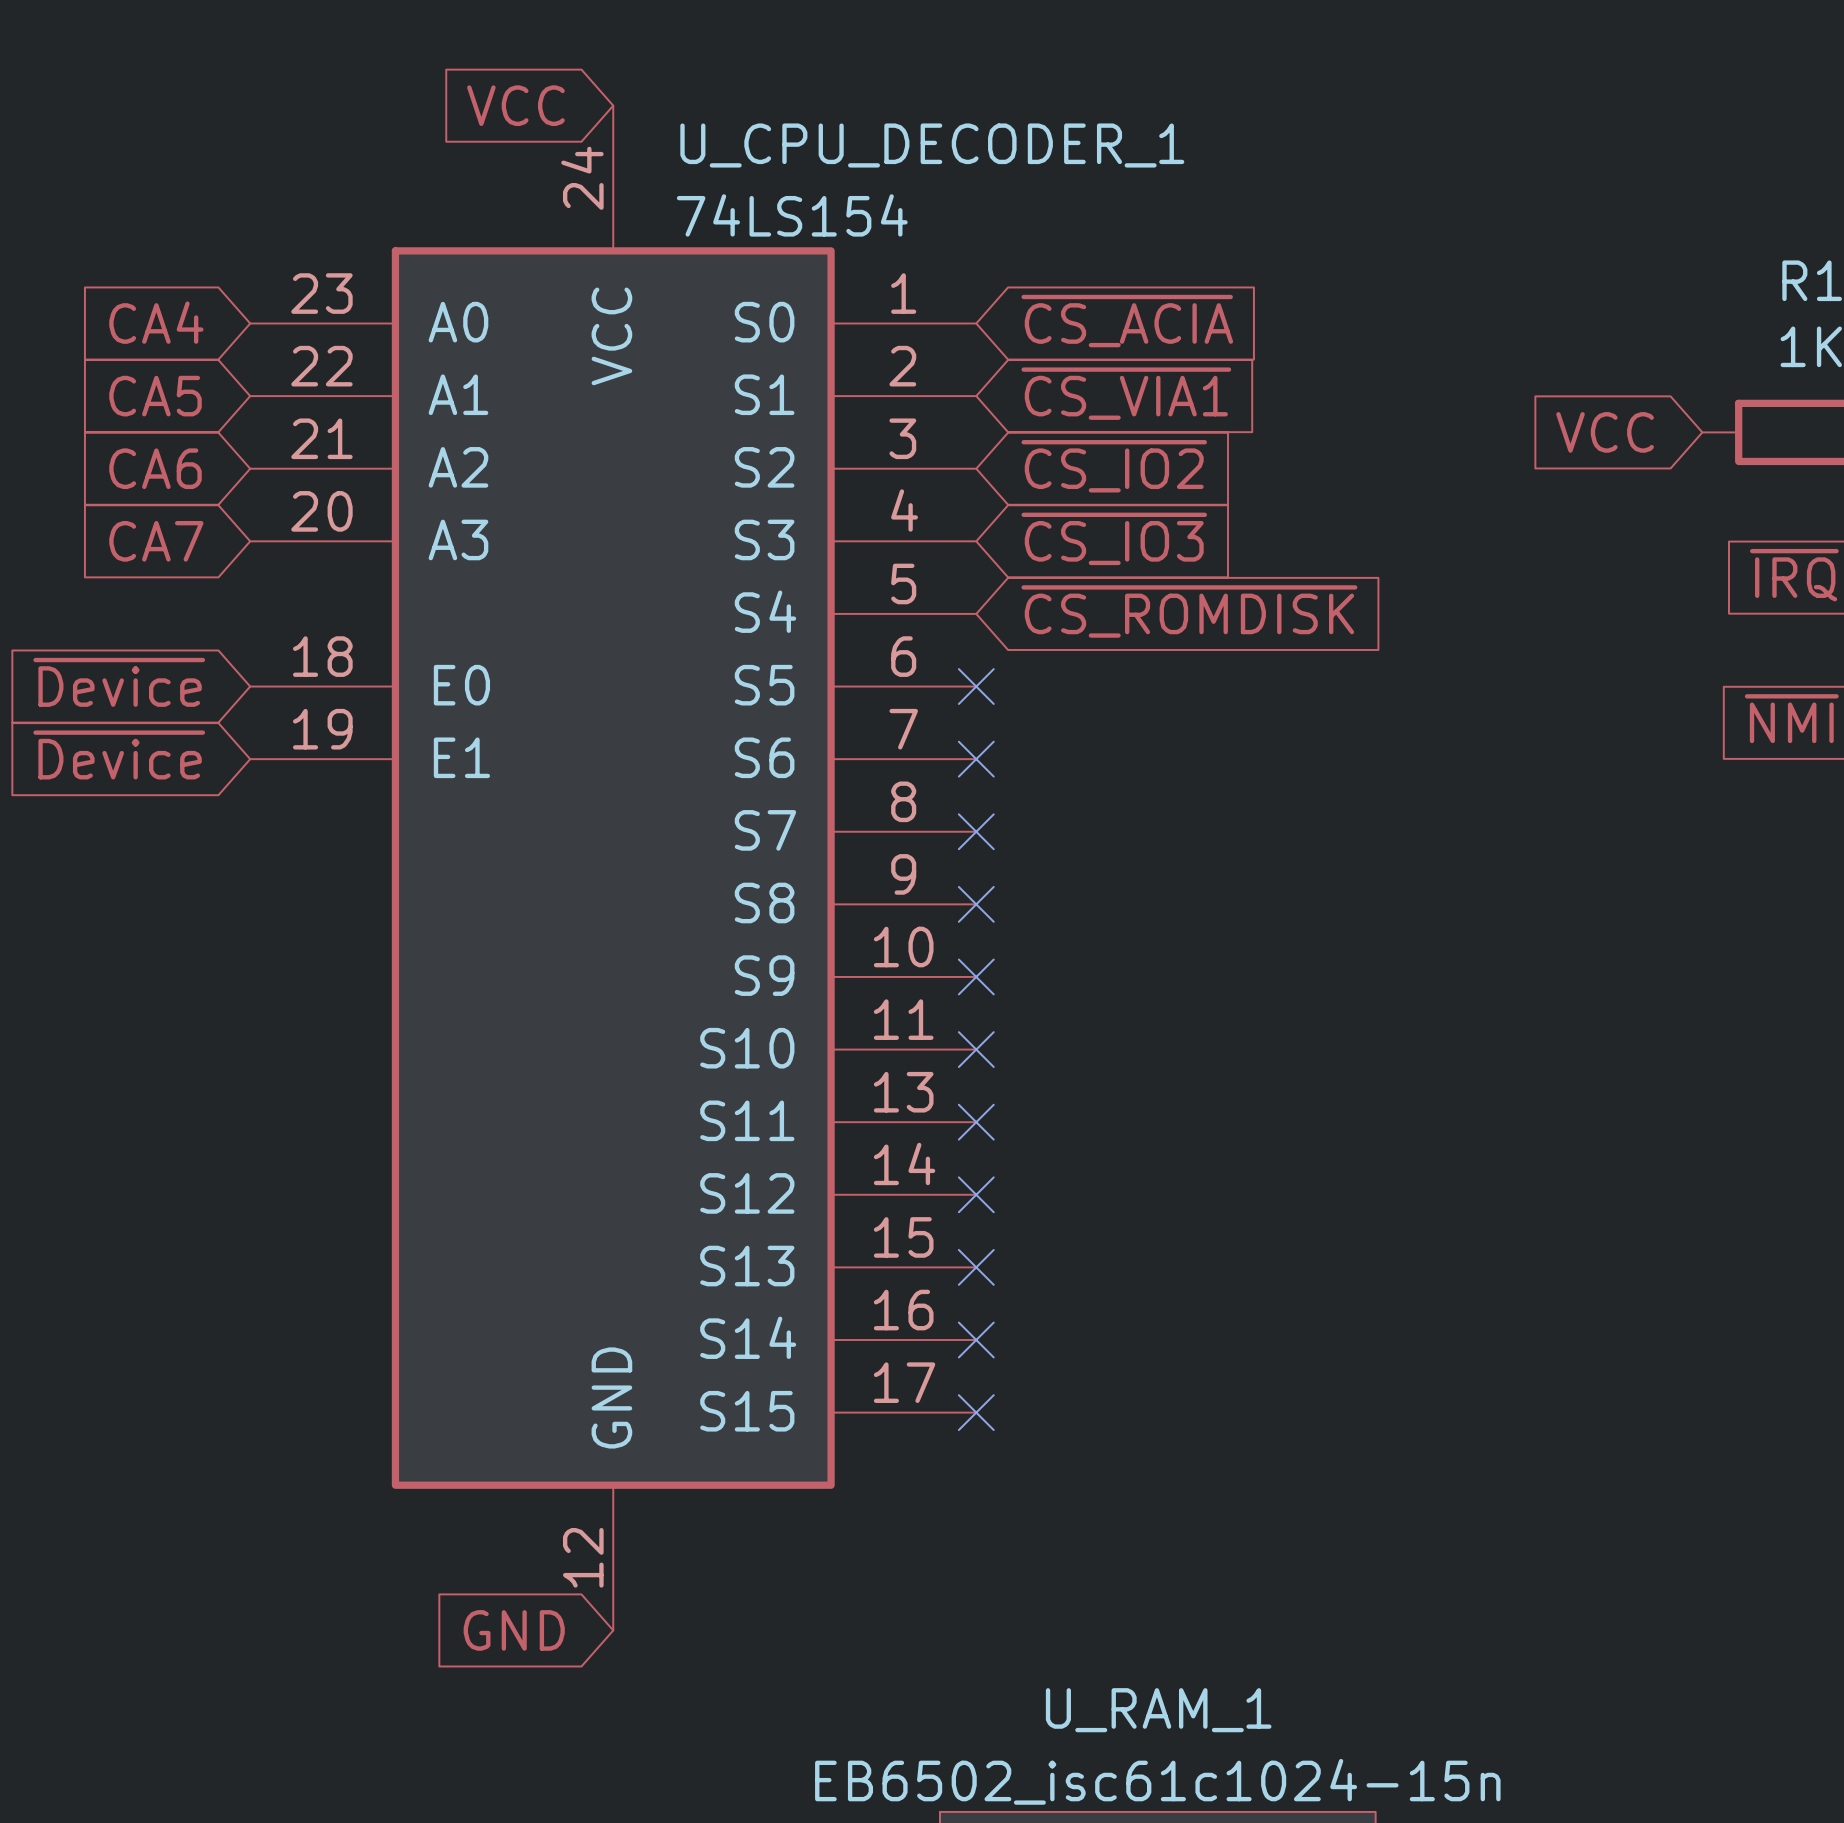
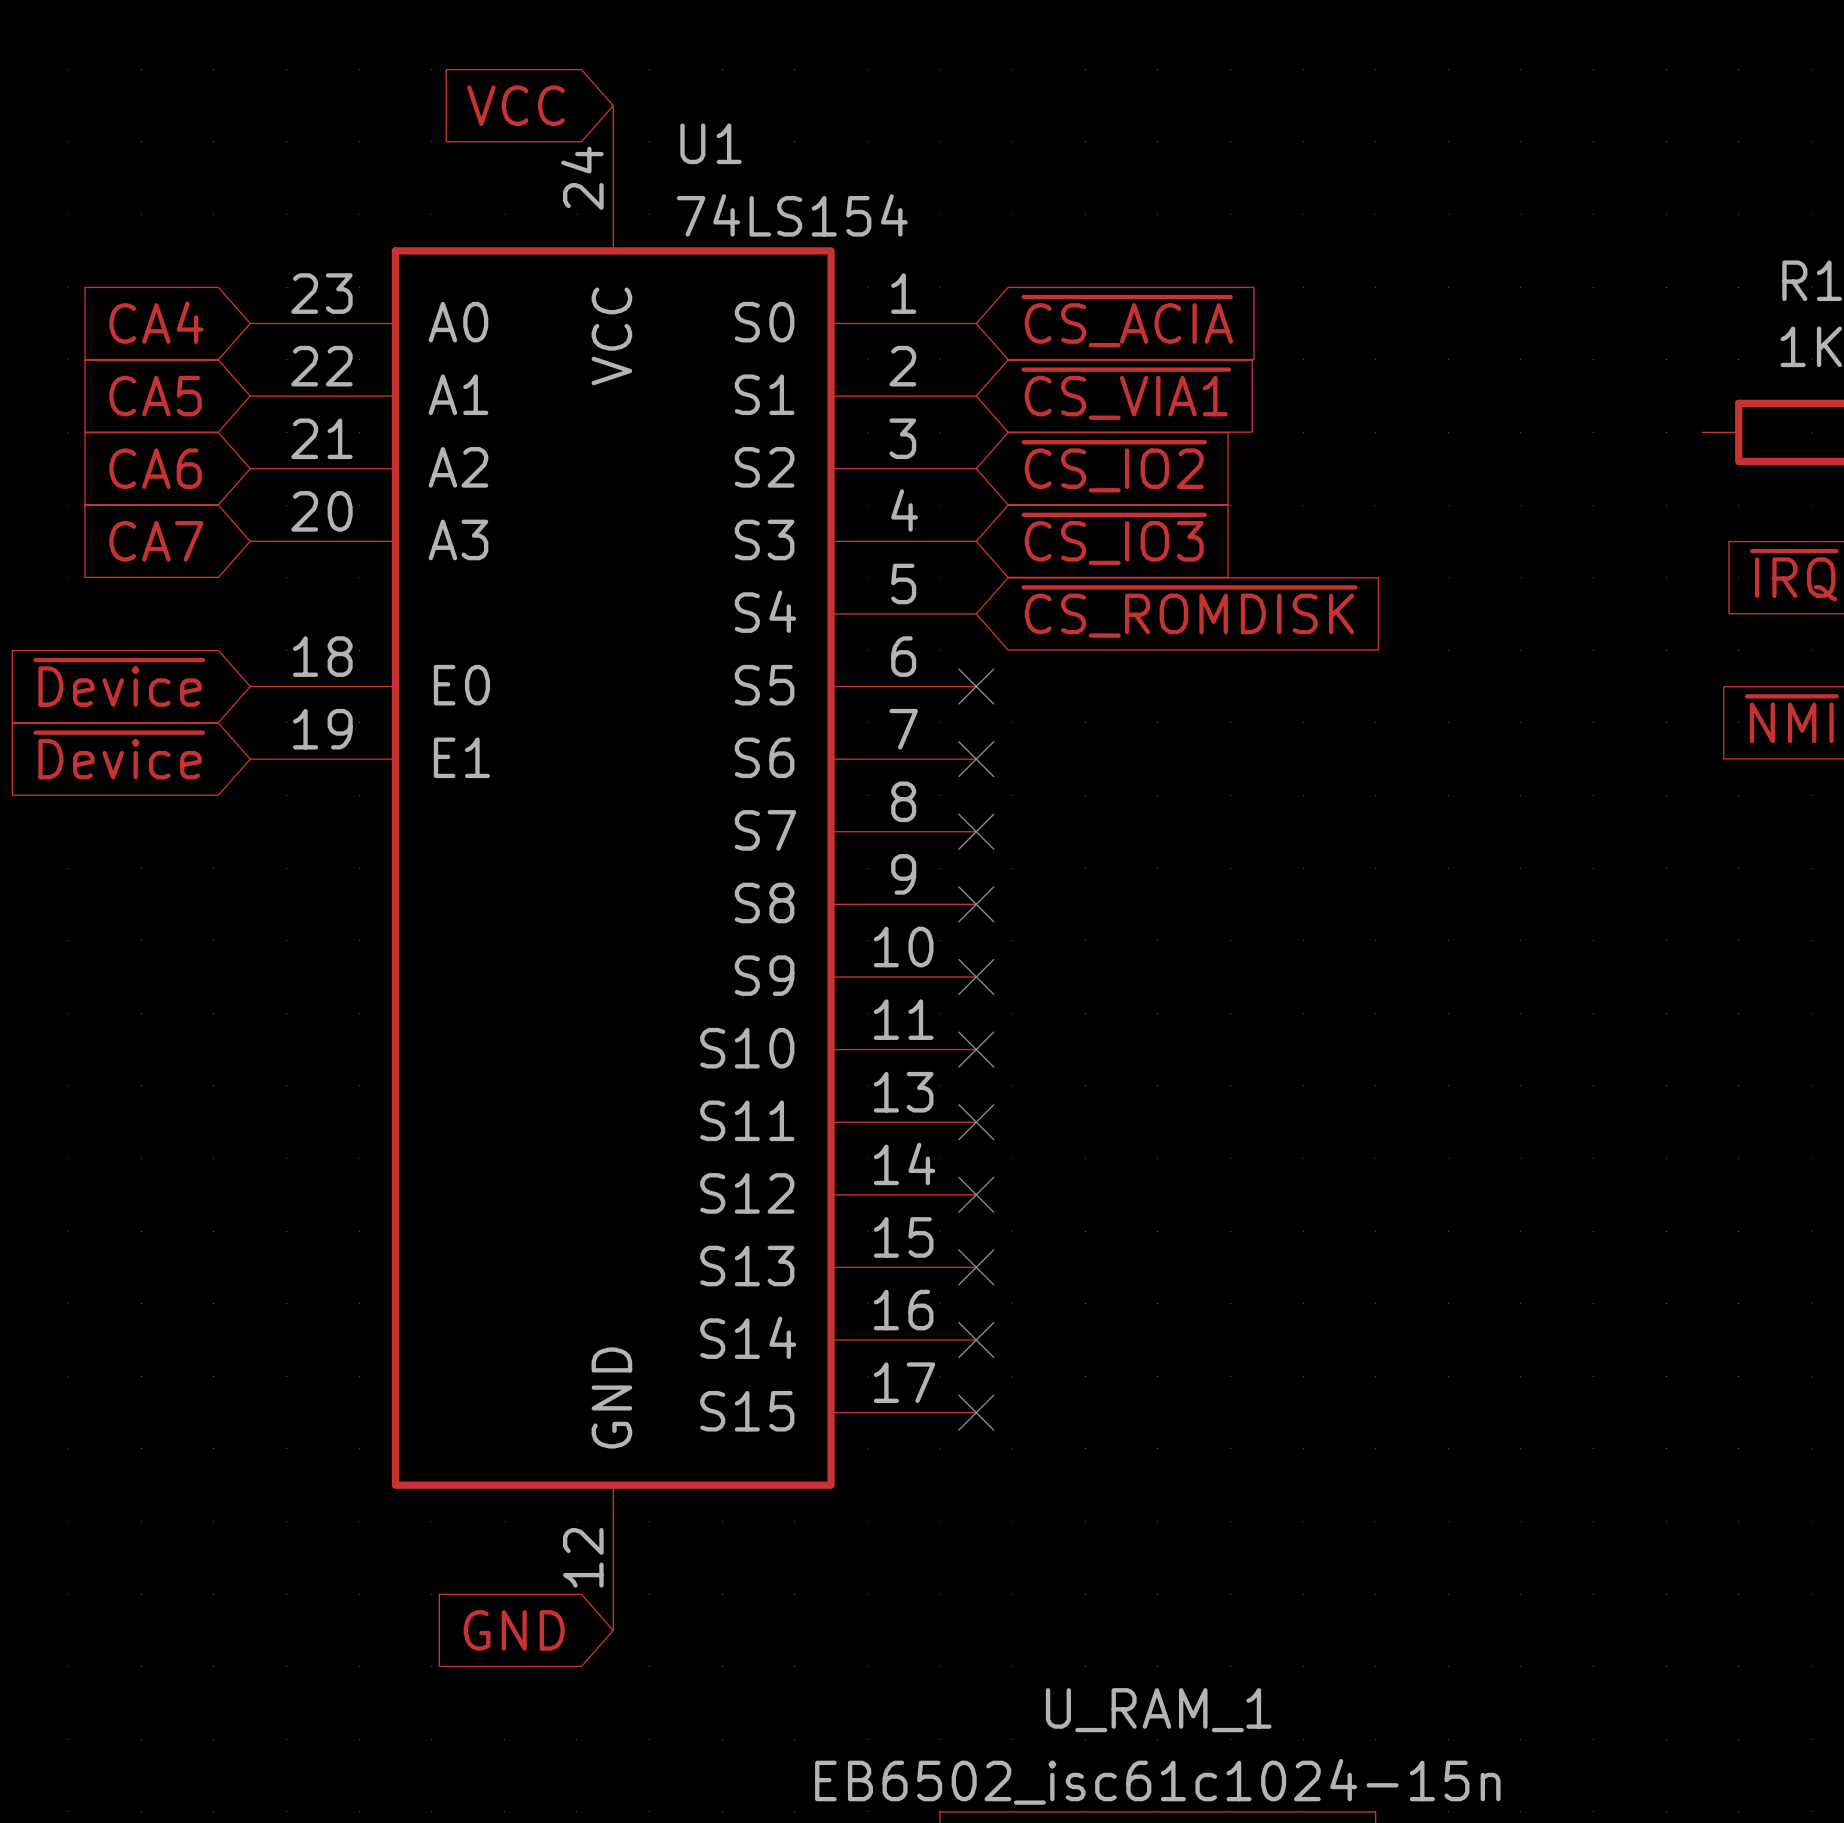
U_CPU_DECODER_1 name: U_CPU_DECODER_1 (932, 145) -> U1 (711, 143)
global label: VCC (1605, 432) -> none

